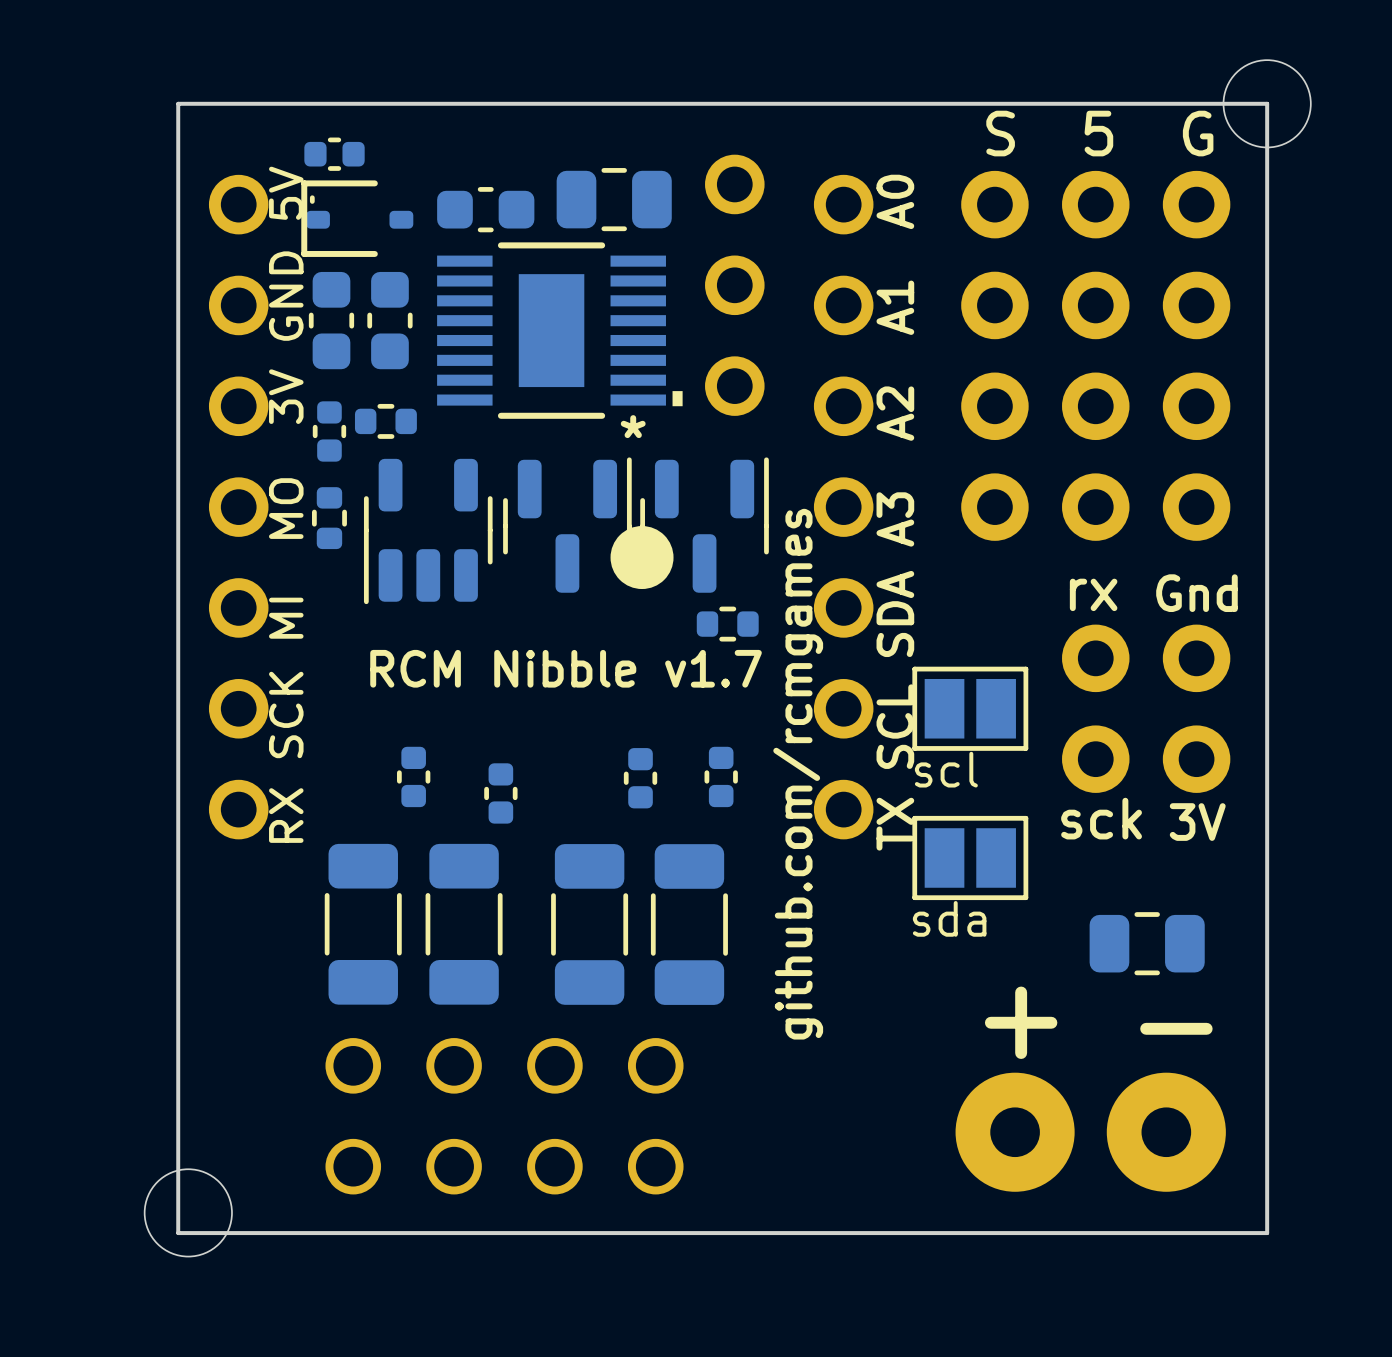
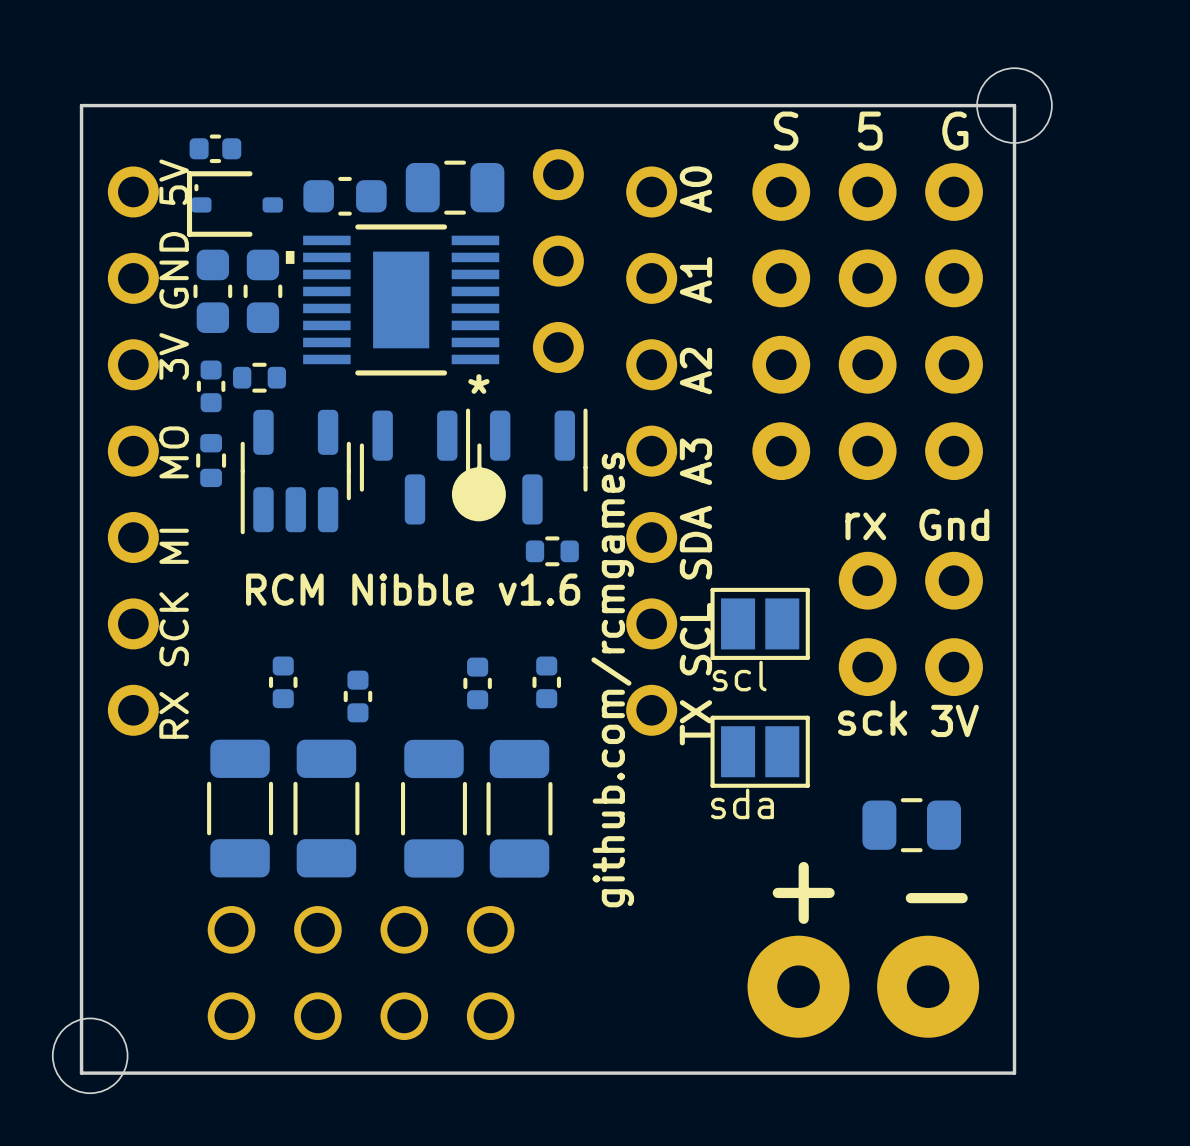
part footprint: [437, 242, 683, 419] -> [285, 224, 500, 376]
text: RCM Nibble v1.7 (566, 668) -> RCM Nibble v1.6 (413, 589)

